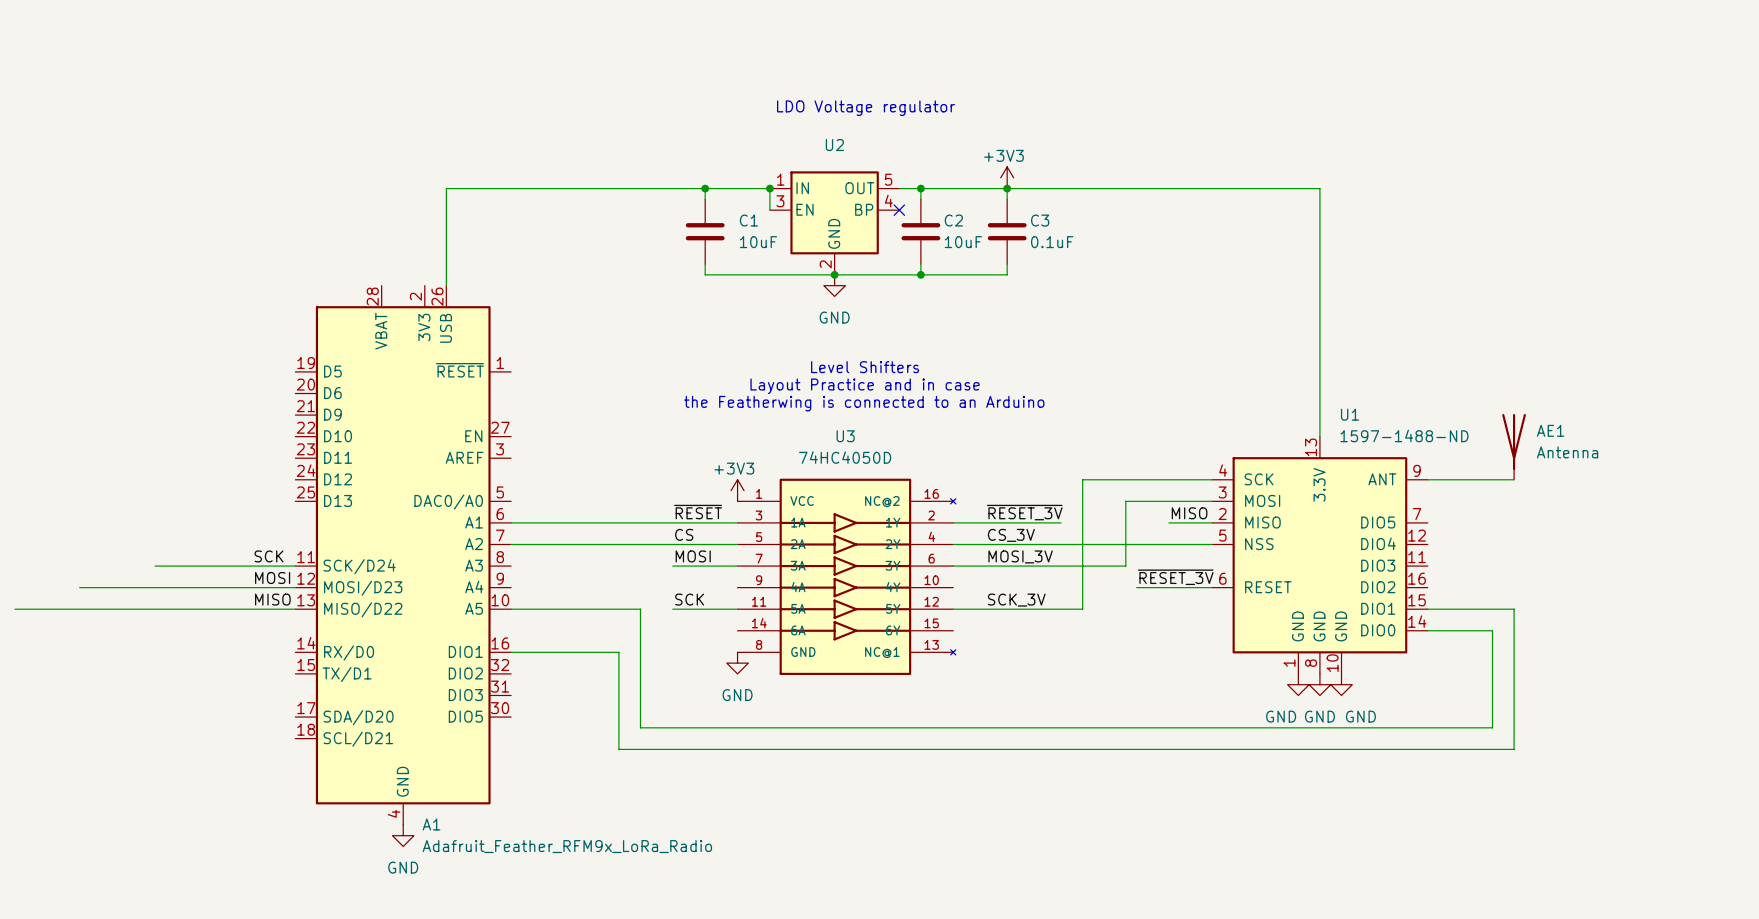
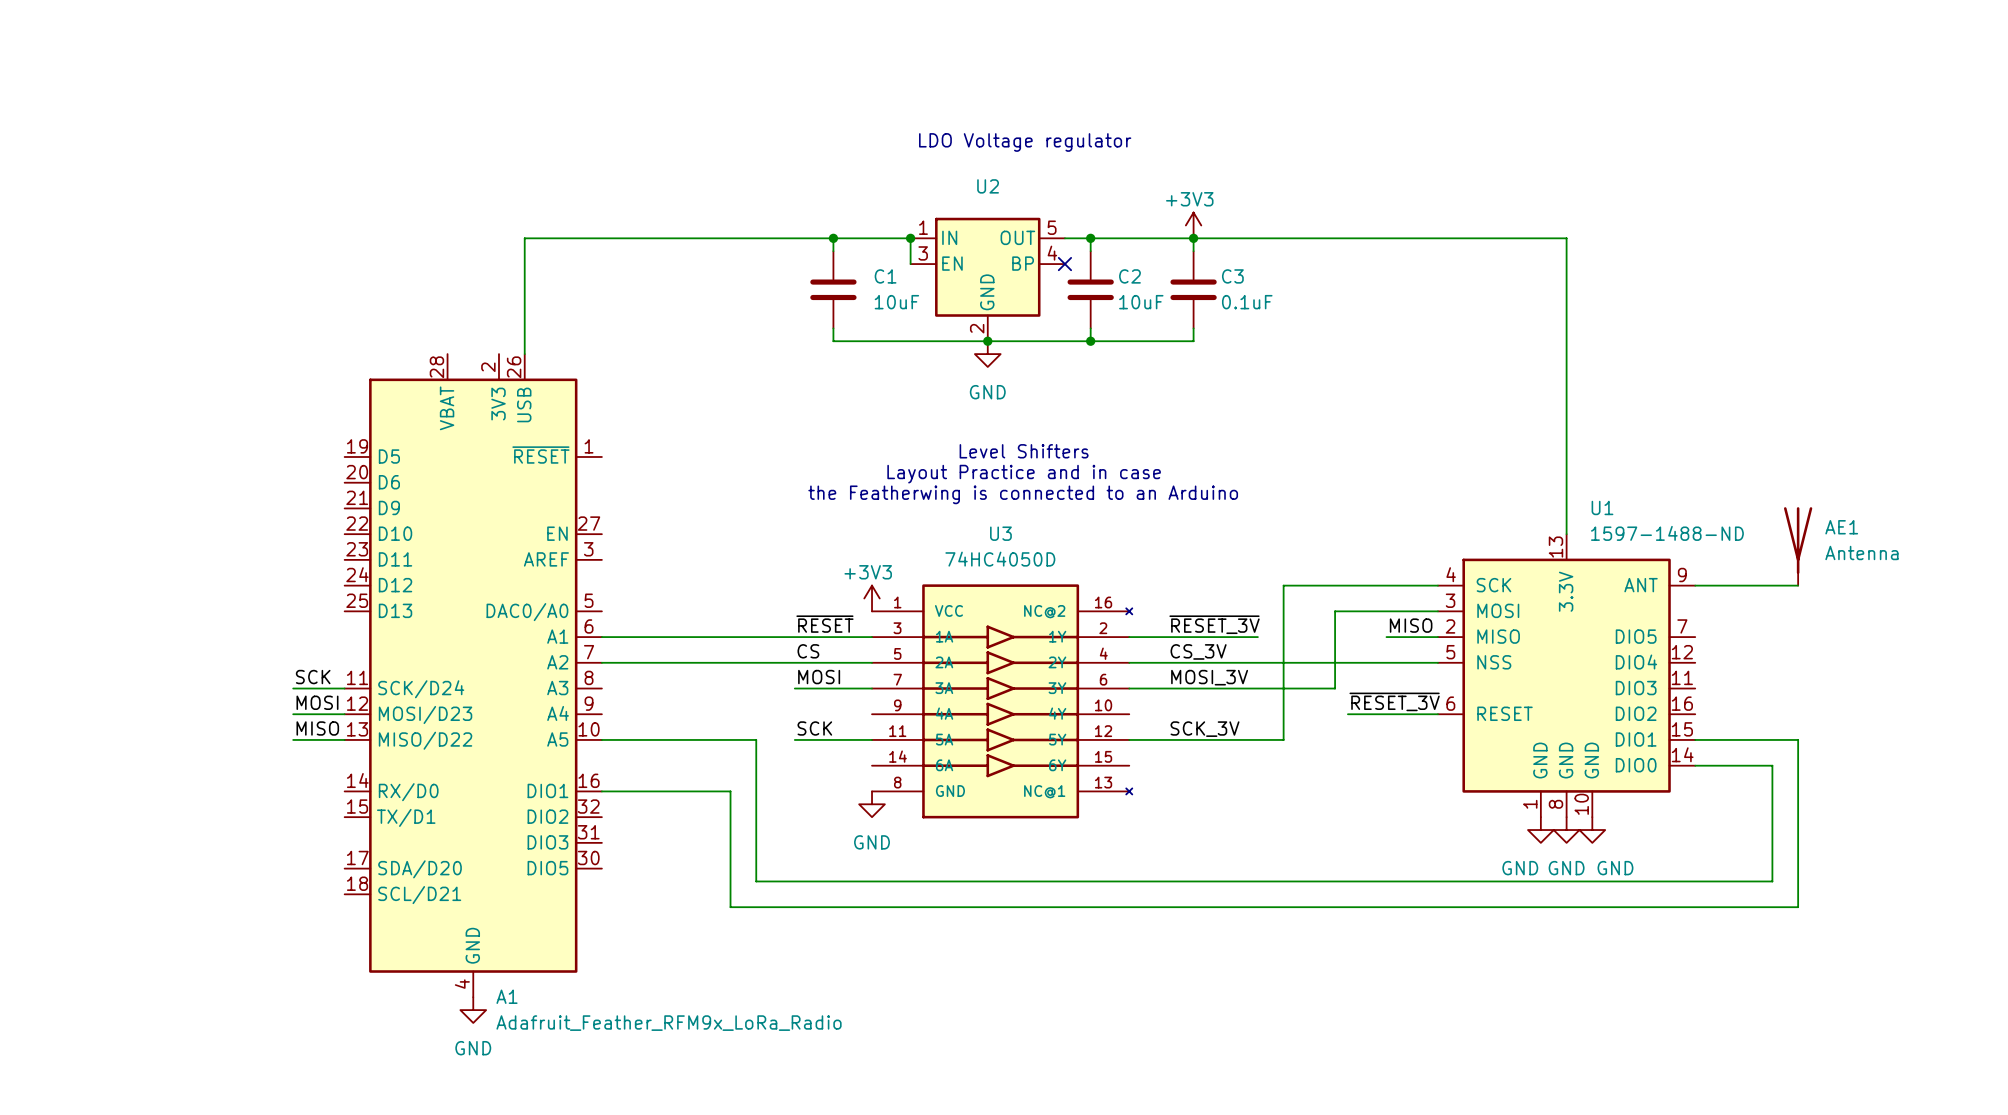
wire: (155, 566) (252, 566) -> none
wire: (79, 587) (252, 587) -> none
wire: (14, 609) (252, 609) -> none

